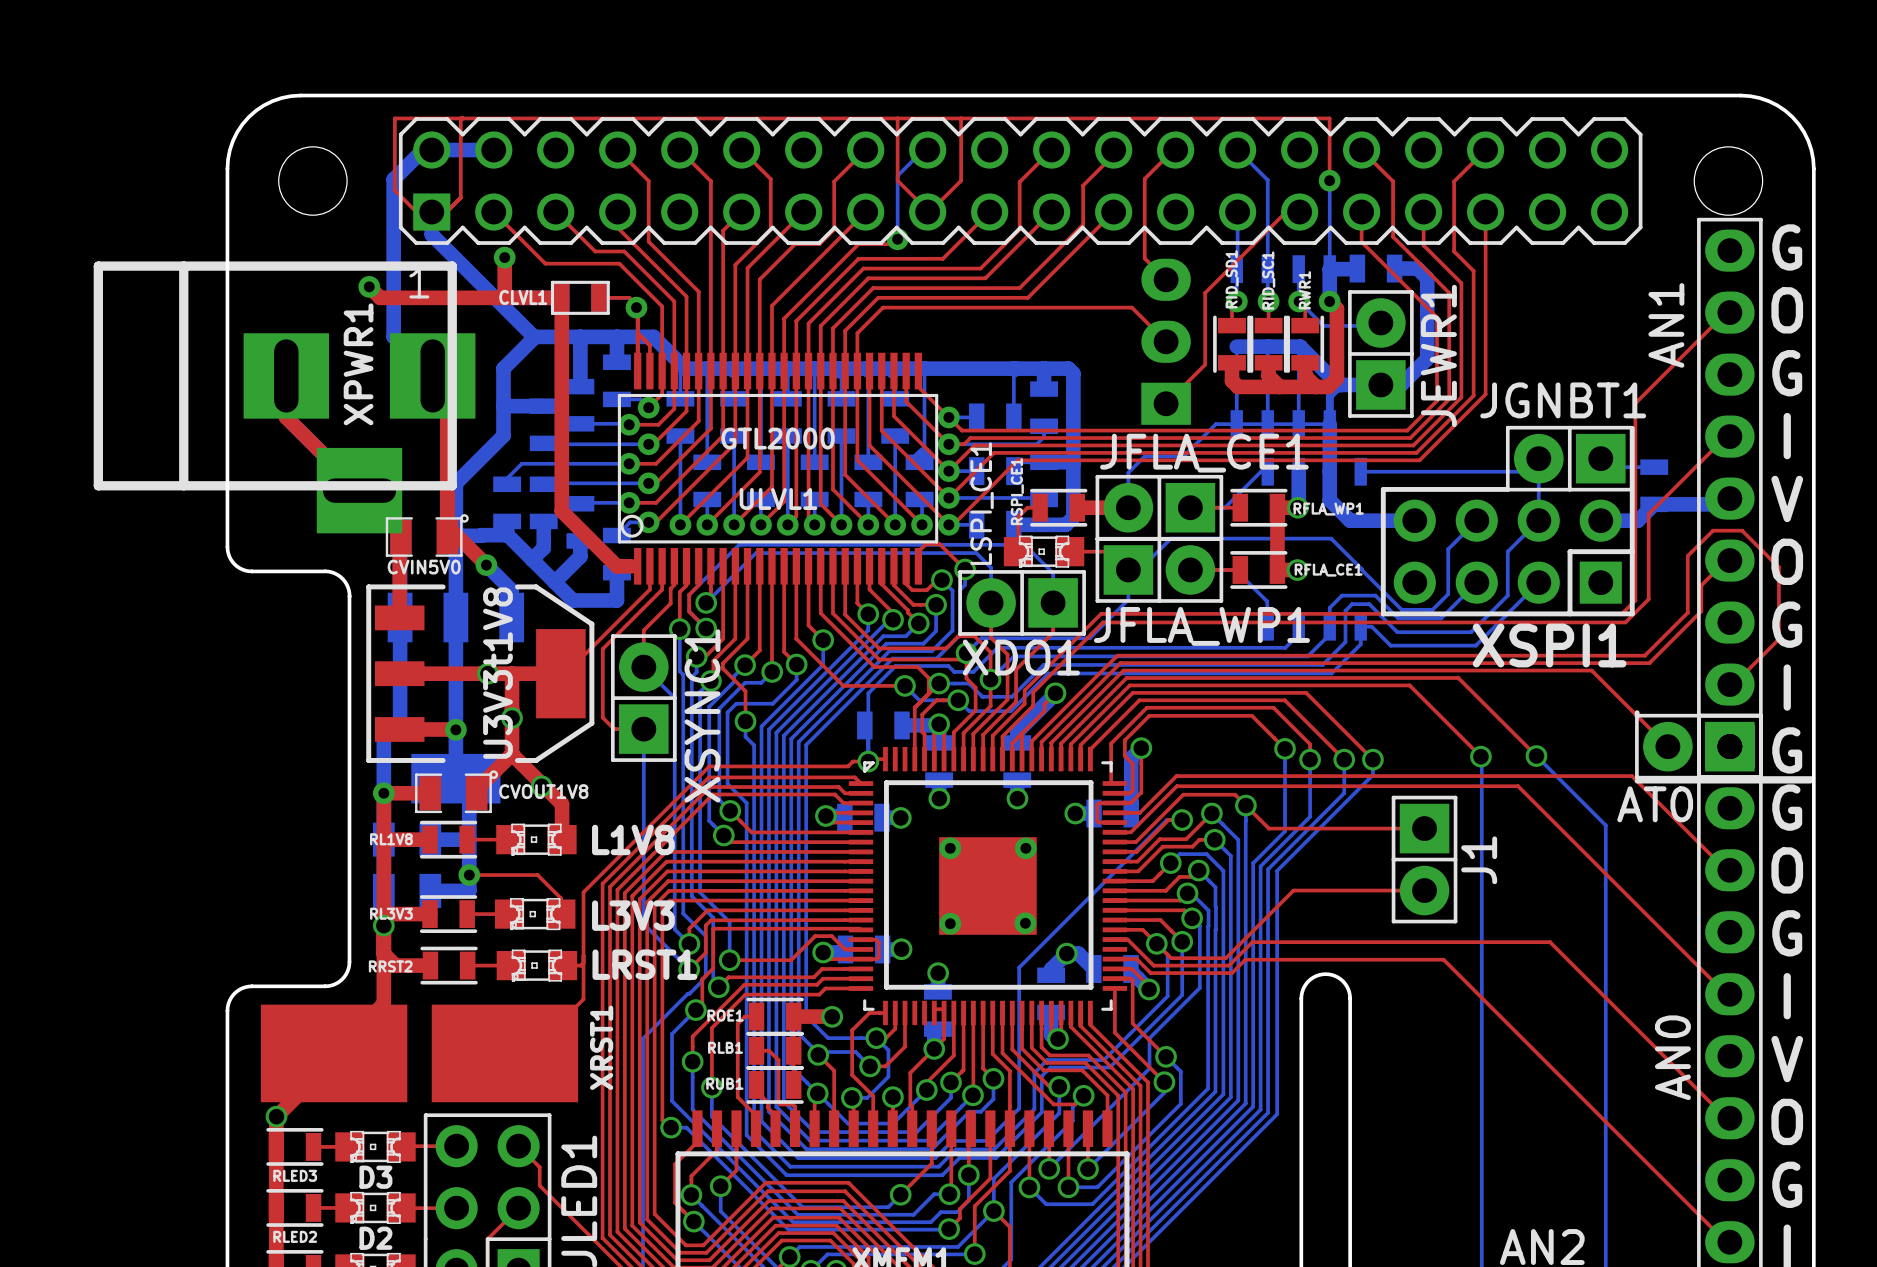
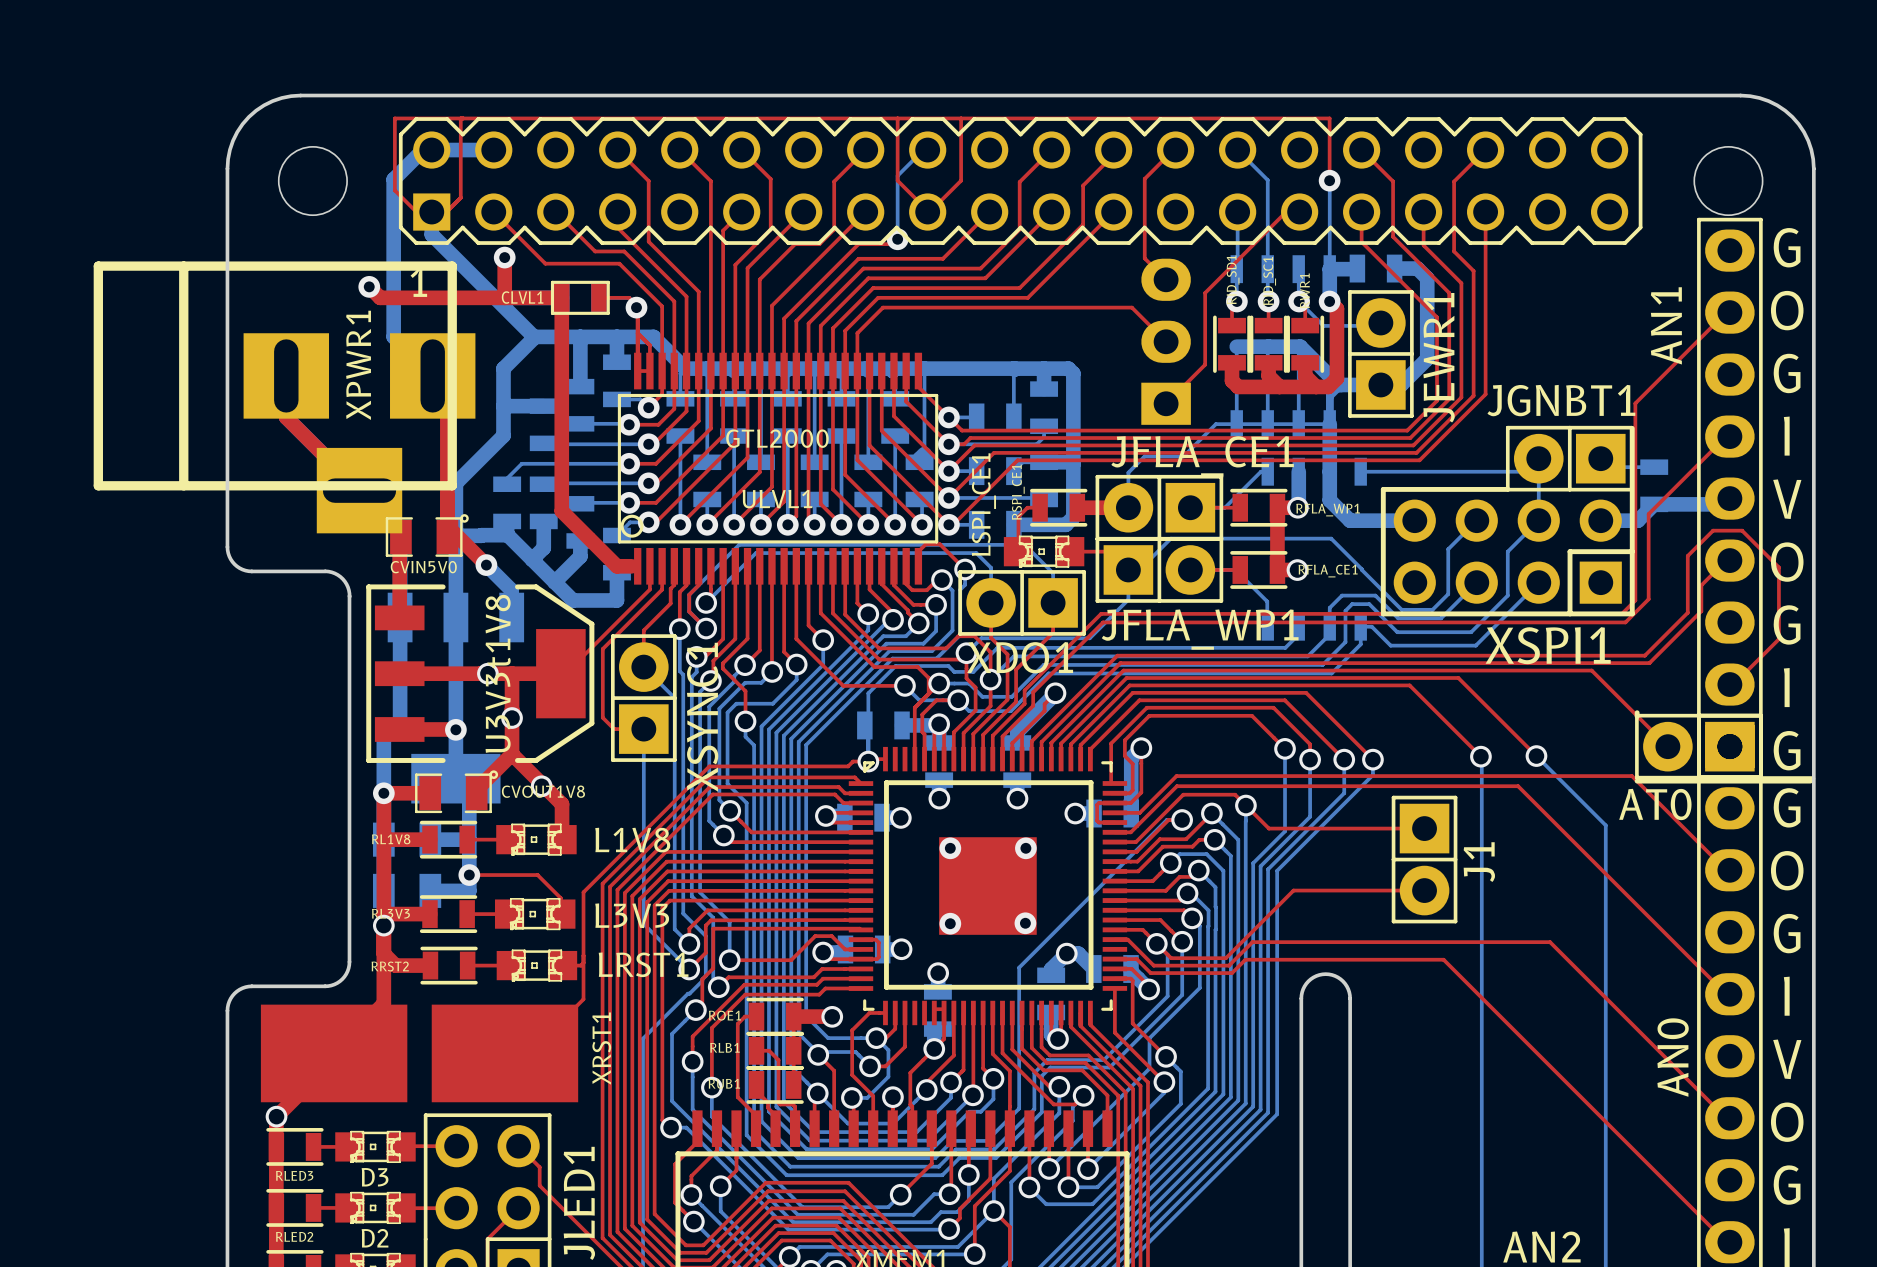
top track: none -> (637, 371) (649, 371)

